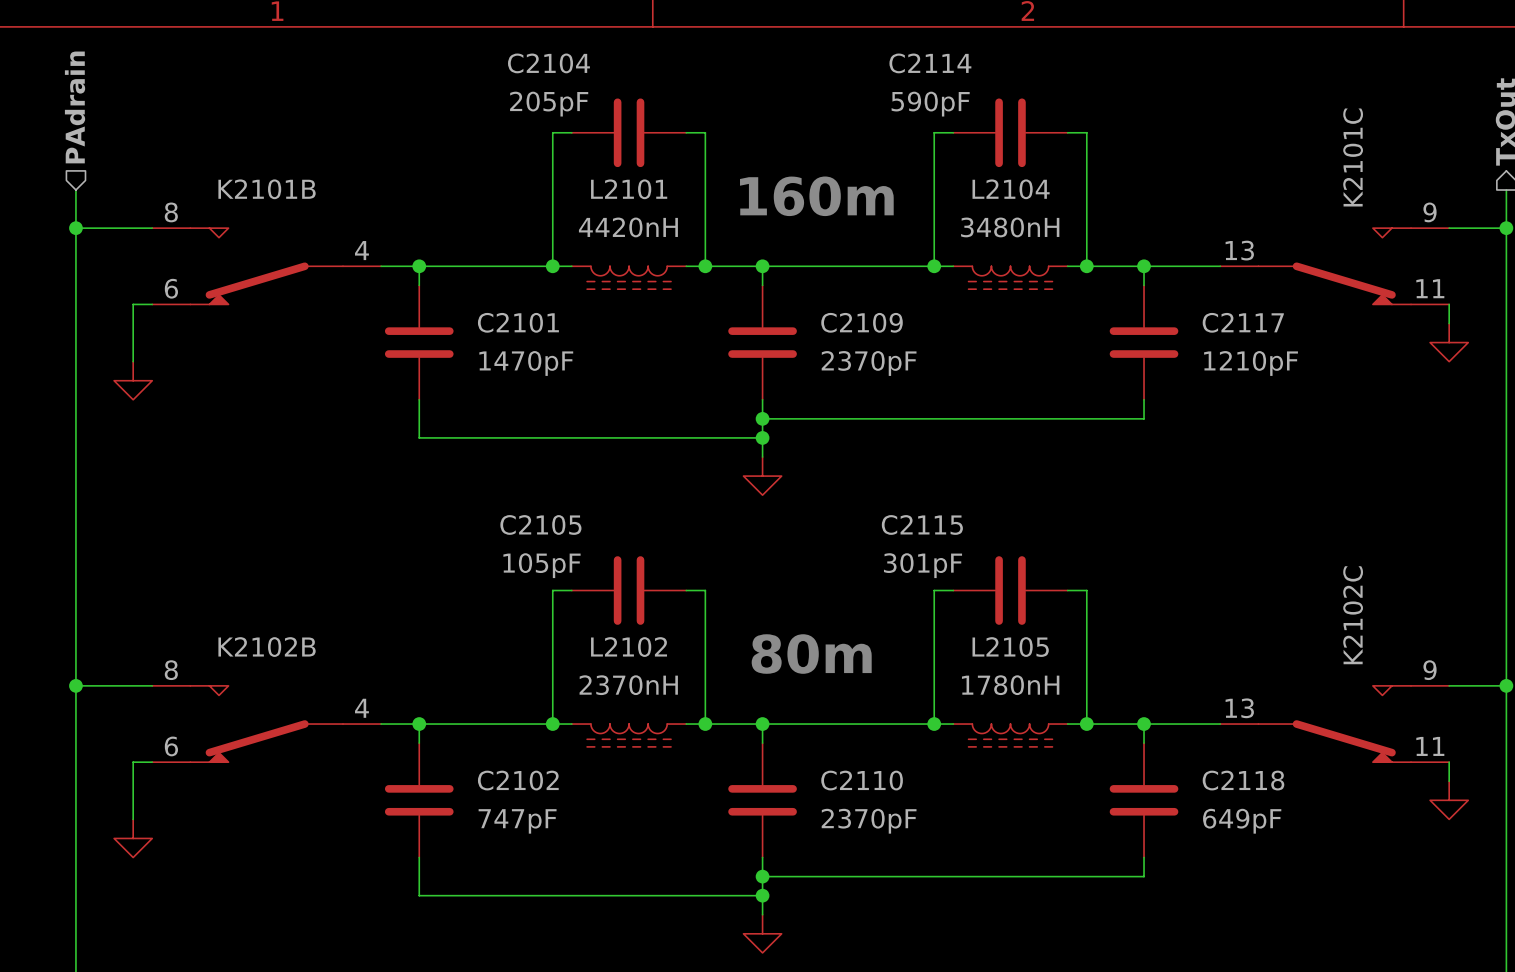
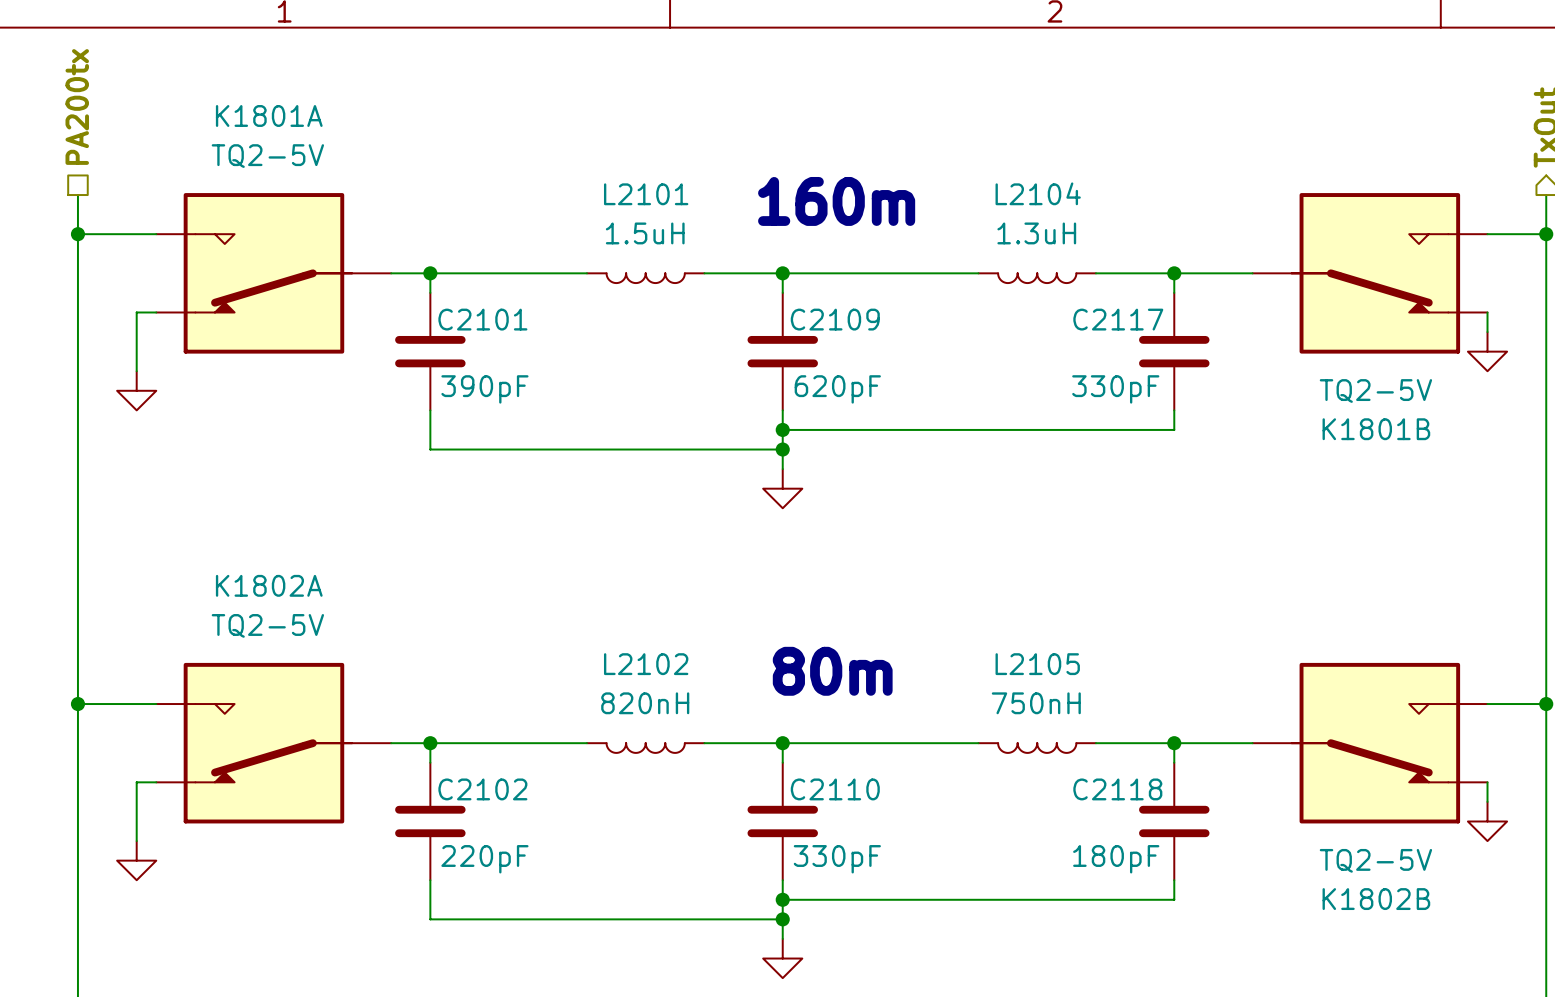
hierarchical label shape: input (75, 107) -> passive (77, 106)
hierarchical label: PAdrain (75, 107) -> PA200tx (77, 106)
wire: (571, 132) (552, 132) (552, 266) -> none
C2104: 205pF (629, 132) -> none
wire: (686, 132) (705, 132) (705, 266) -> none
wire: (953, 132) (934, 132) (934, 266) -> none
C2114: 590pF (1010, 132) -> none
wire: (1067, 132) (1086, 132) (1086, 266) -> none
L2101 value: 4420nH (628, 227) -> 1.5uH (645, 233)
L2104 value: 3480nH (1010, 227) -> 1.3uH (1036, 233)
K2101B: (266, 266) -> none
K1801A: none -> TQ2-5V (273, 273)
junction: (552, 266) -> none
L2101 symbol: [571, 266, 687, 290] -> [586, 273, 705, 284]
junction: (705, 266) -> none
junction: (934, 266) -> none
L2104 symbol: [953, 266, 1068, 290] -> [978, 273, 1096, 284]
junction: (1086, 266) -> none
K2101C: (1334, 266) -> none
K1801B: none -> TQ2-5V (1370, 273)
C2101 name position: C2101 (518, 322) -> C2101 (482, 319)
C2109 name position: C2109 (862, 322) -> C2109 (835, 319)
C2117 name position: C2117 (1243, 322) -> C2117 (1118, 319)
C2101 value: 1470pF (526, 363) -> 390pF (484, 389)
C2109 value: 2370pF (869, 363) -> 620pF (837, 389)
C2117 value: 1210pF (1251, 363) -> 330pF (1115, 389)
wire: (571, 590) (552, 590) (552, 724) -> none
C2105: 105pF (629, 590) -> none
wire: (686, 590) (705, 590) (705, 724) -> none
wire: (953, 590) (934, 590) (934, 724) -> none
C2115: 301pF (1010, 590) -> none
wire: (1067, 590) (1086, 590) (1086, 724) -> none
L2102 value: 2370nH (628, 685) -> 820nH (645, 703)
L2105 value: 1780nH (1010, 685) -> 750nH (1036, 703)
K2102B: (266, 724) -> none
K1802A: none -> TQ2-5V (273, 743)
junction: (552, 724) -> none
L2102 symbol: [571, 724, 687, 747] -> [586, 743, 705, 753]
junction: (705, 724) -> none
junction: (934, 724) -> none
L2105 symbol: [953, 724, 1068, 747] -> [978, 743, 1096, 753]
junction: (1086, 724) -> none
K2102C: (1334, 724) -> none
K1802B: none -> TQ2-5V (1370, 743)
C2102 name position: C2102 (518, 780) -> C2102 (482, 789)
C2110 name position: C2110 (862, 780) -> C2110 (835, 789)
C2118 name position: C2118 (1243, 780) -> C2118 (1117, 789)
C2102 value: 747pF (517, 821) -> 220pF (484, 859)
C2110 value: 2370pF (869, 821) -> 330pF (837, 859)
C2118 value: 649pF (1242, 821) -> 180pF (1116, 859)

